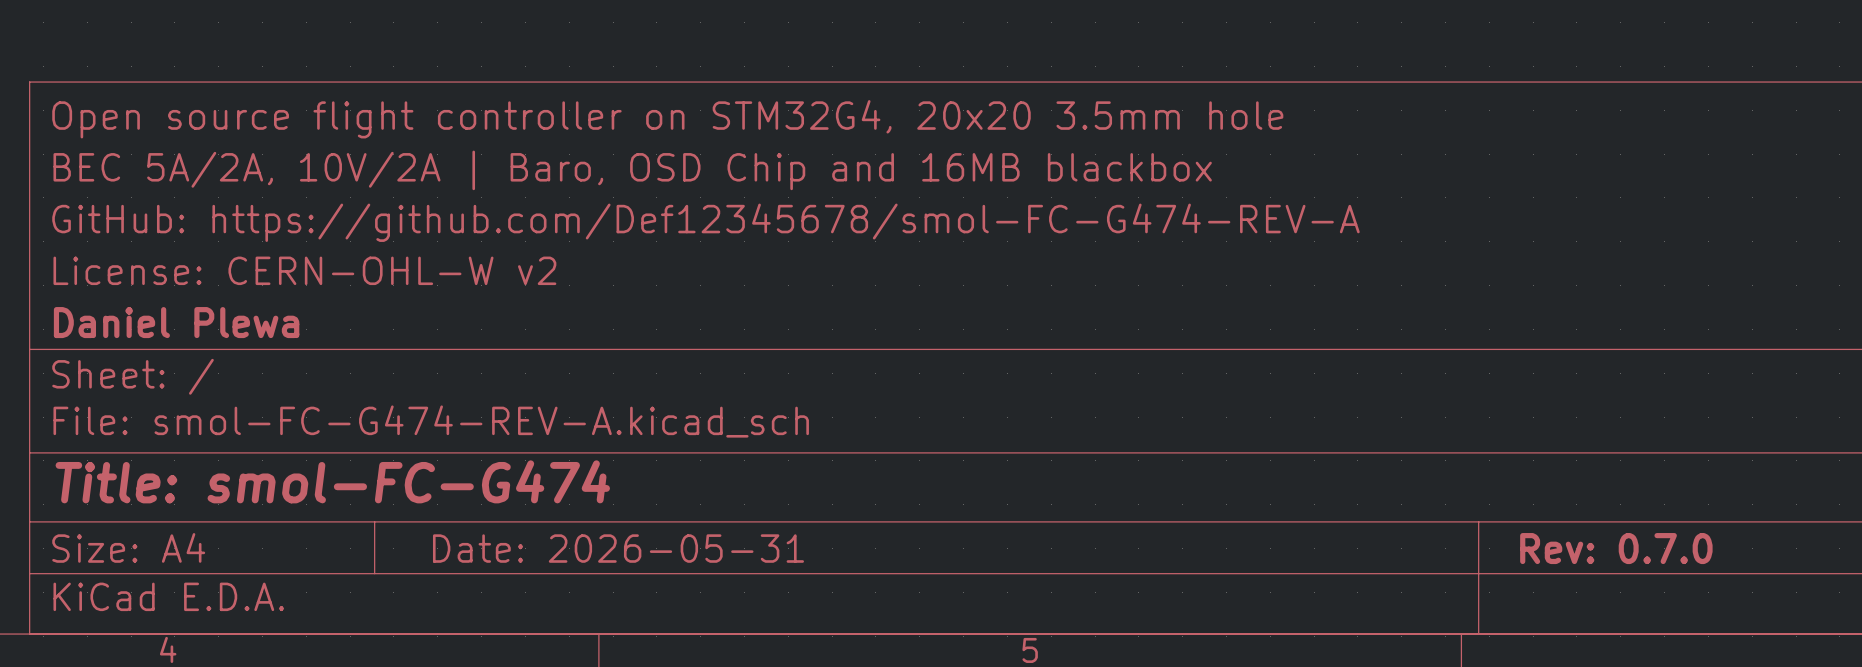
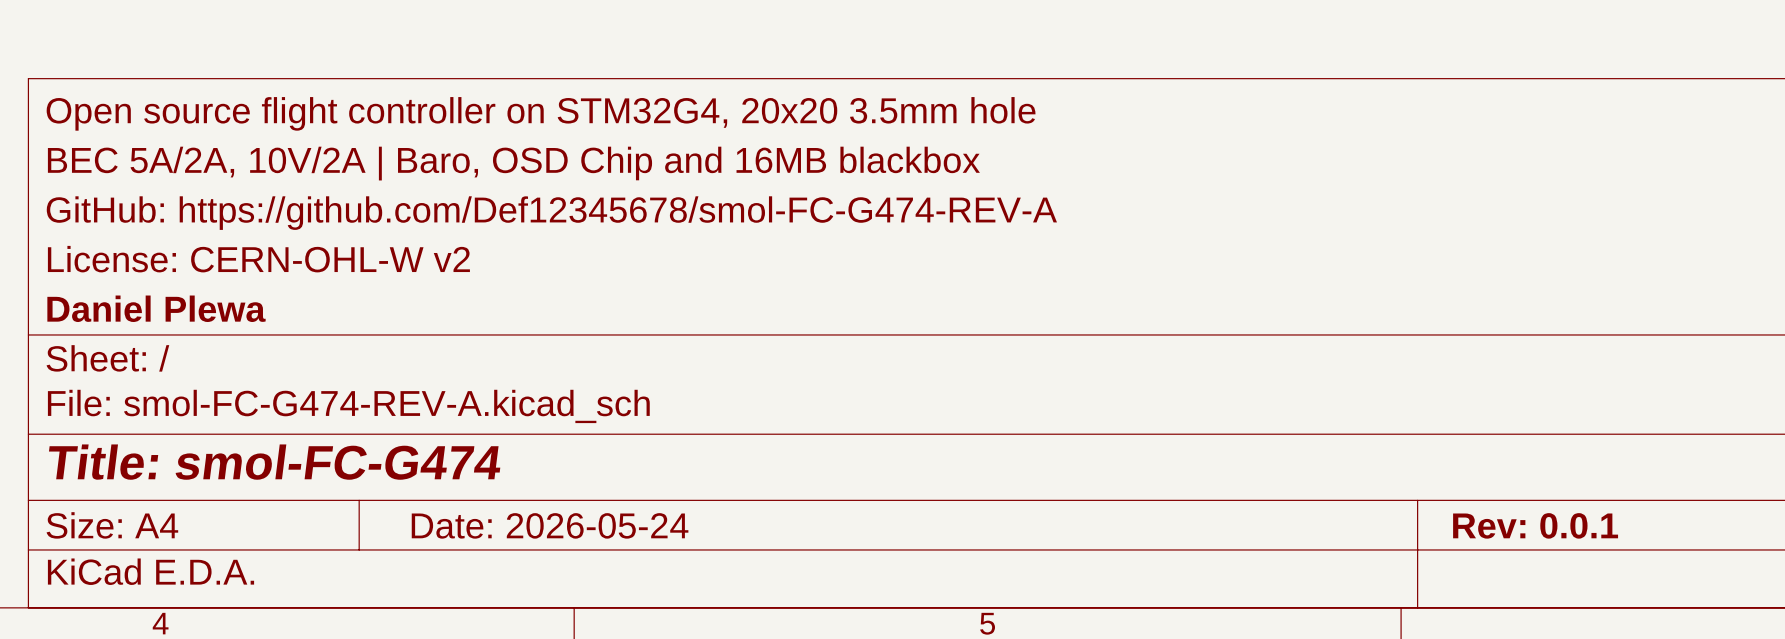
title block: Date: 2026-05-31 (618, 548) -> Date: 2026-05-24 (550, 525)
title block: Rev: 0.7.0 (1616, 548) -> Rev: 0.0.1 (1535, 525)

